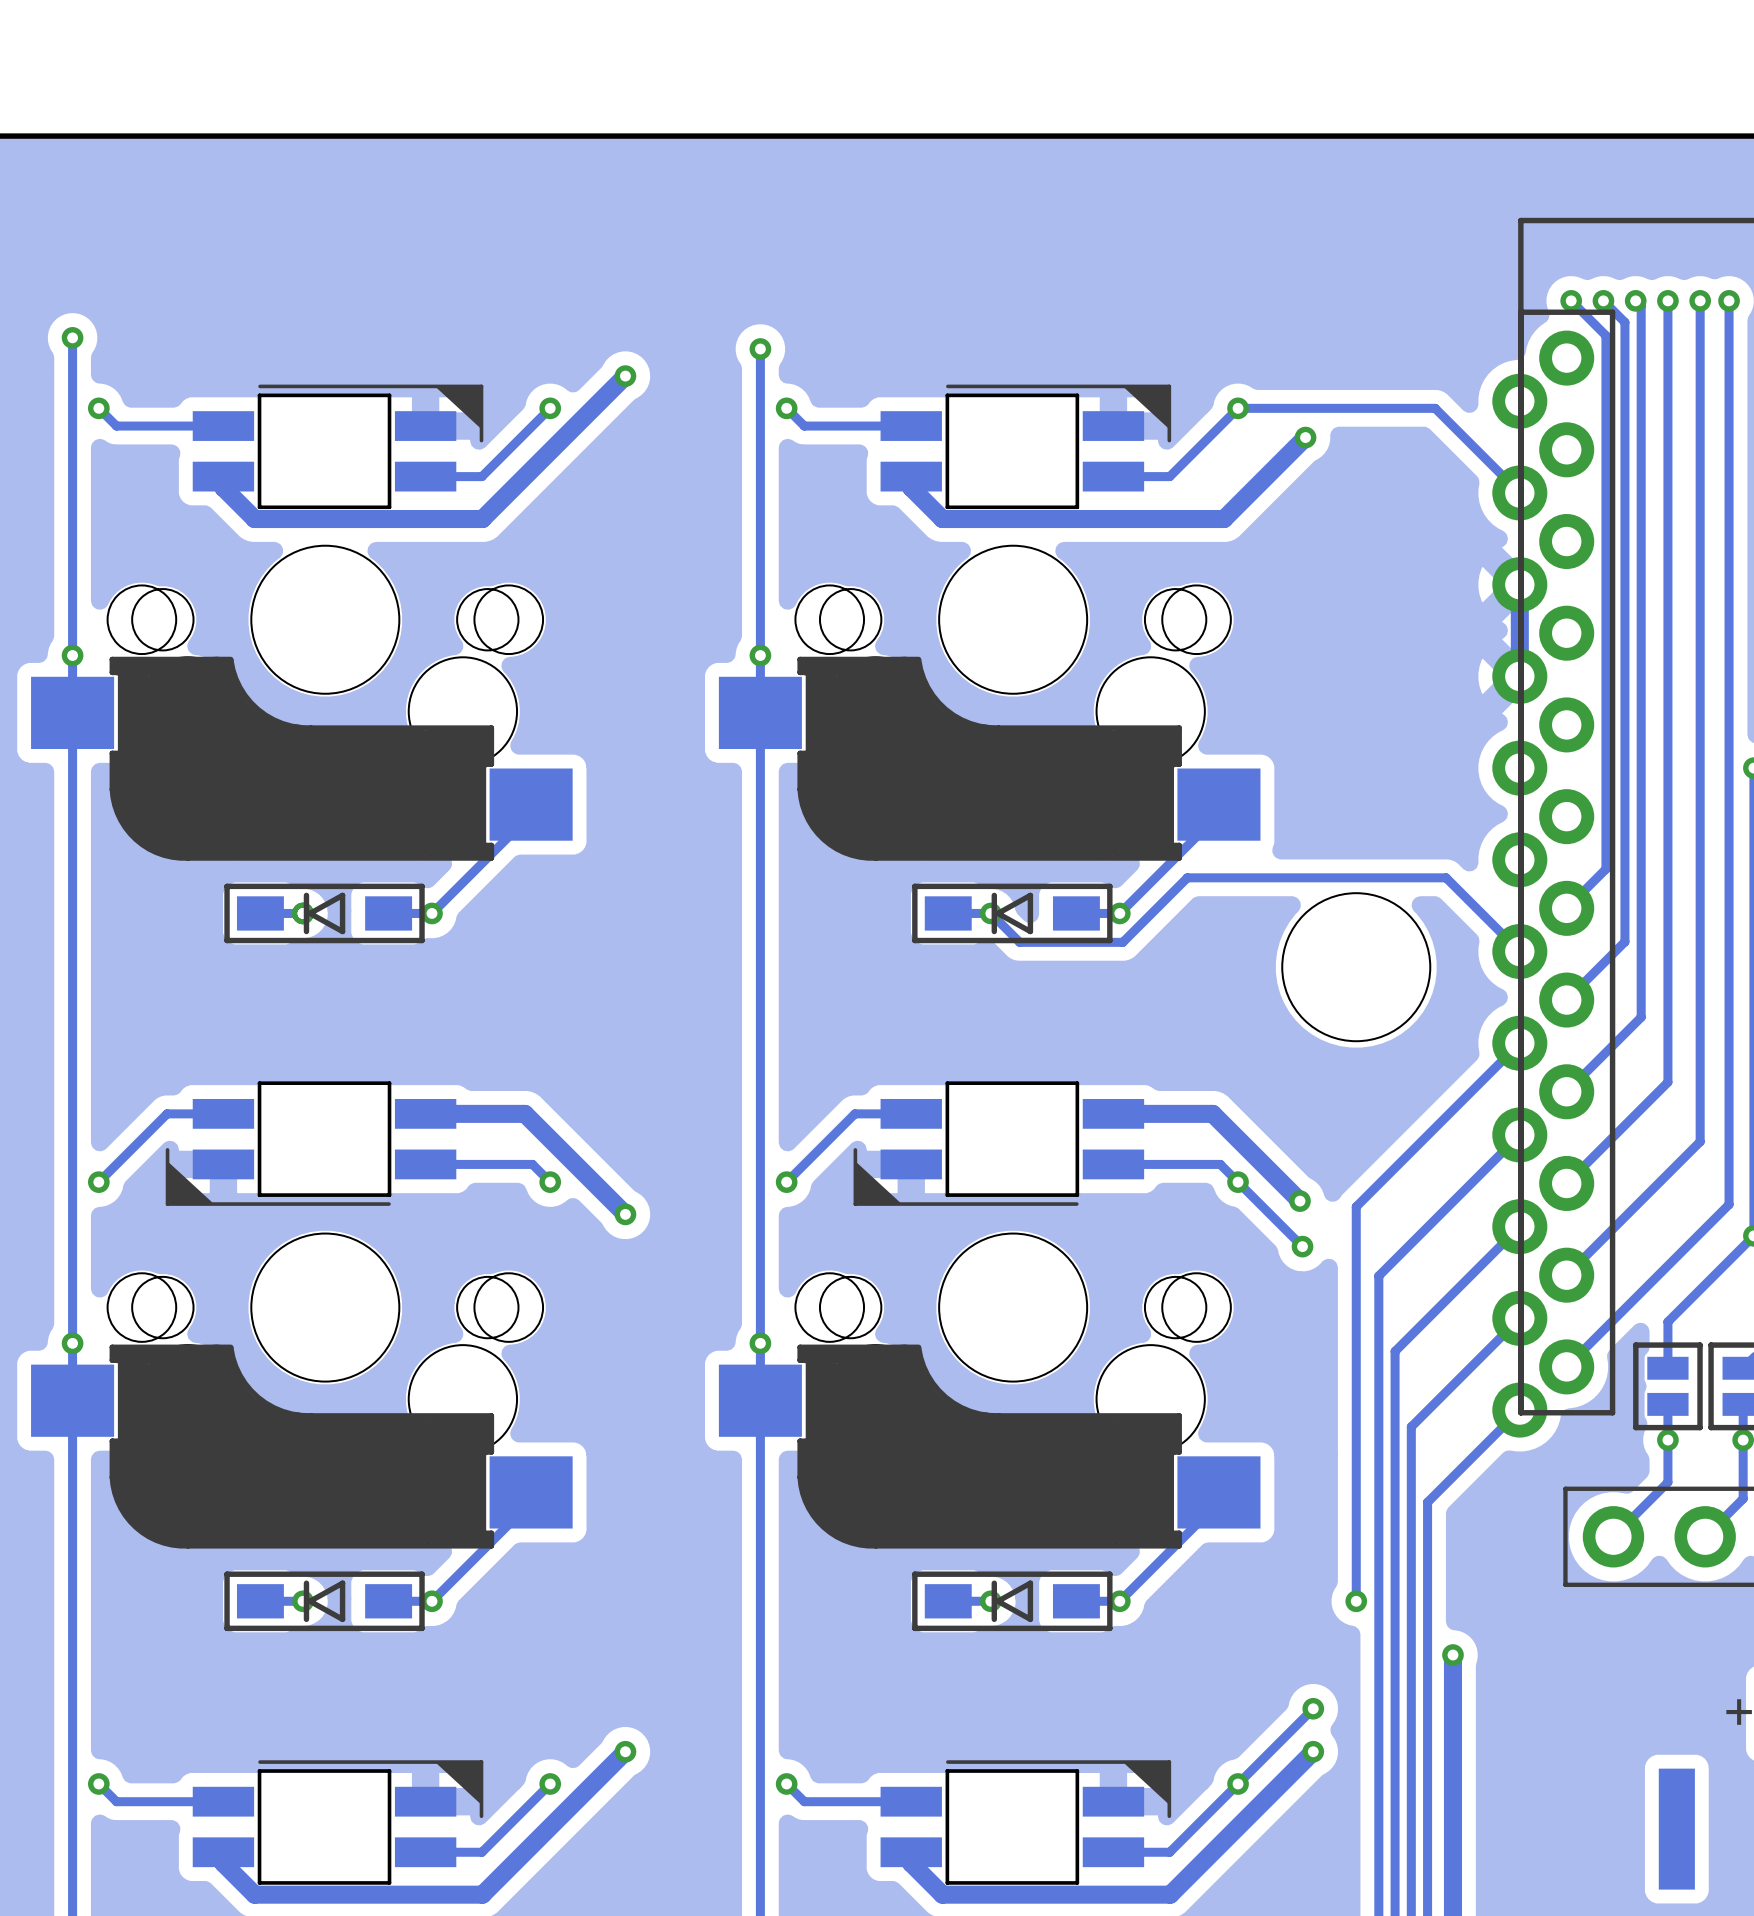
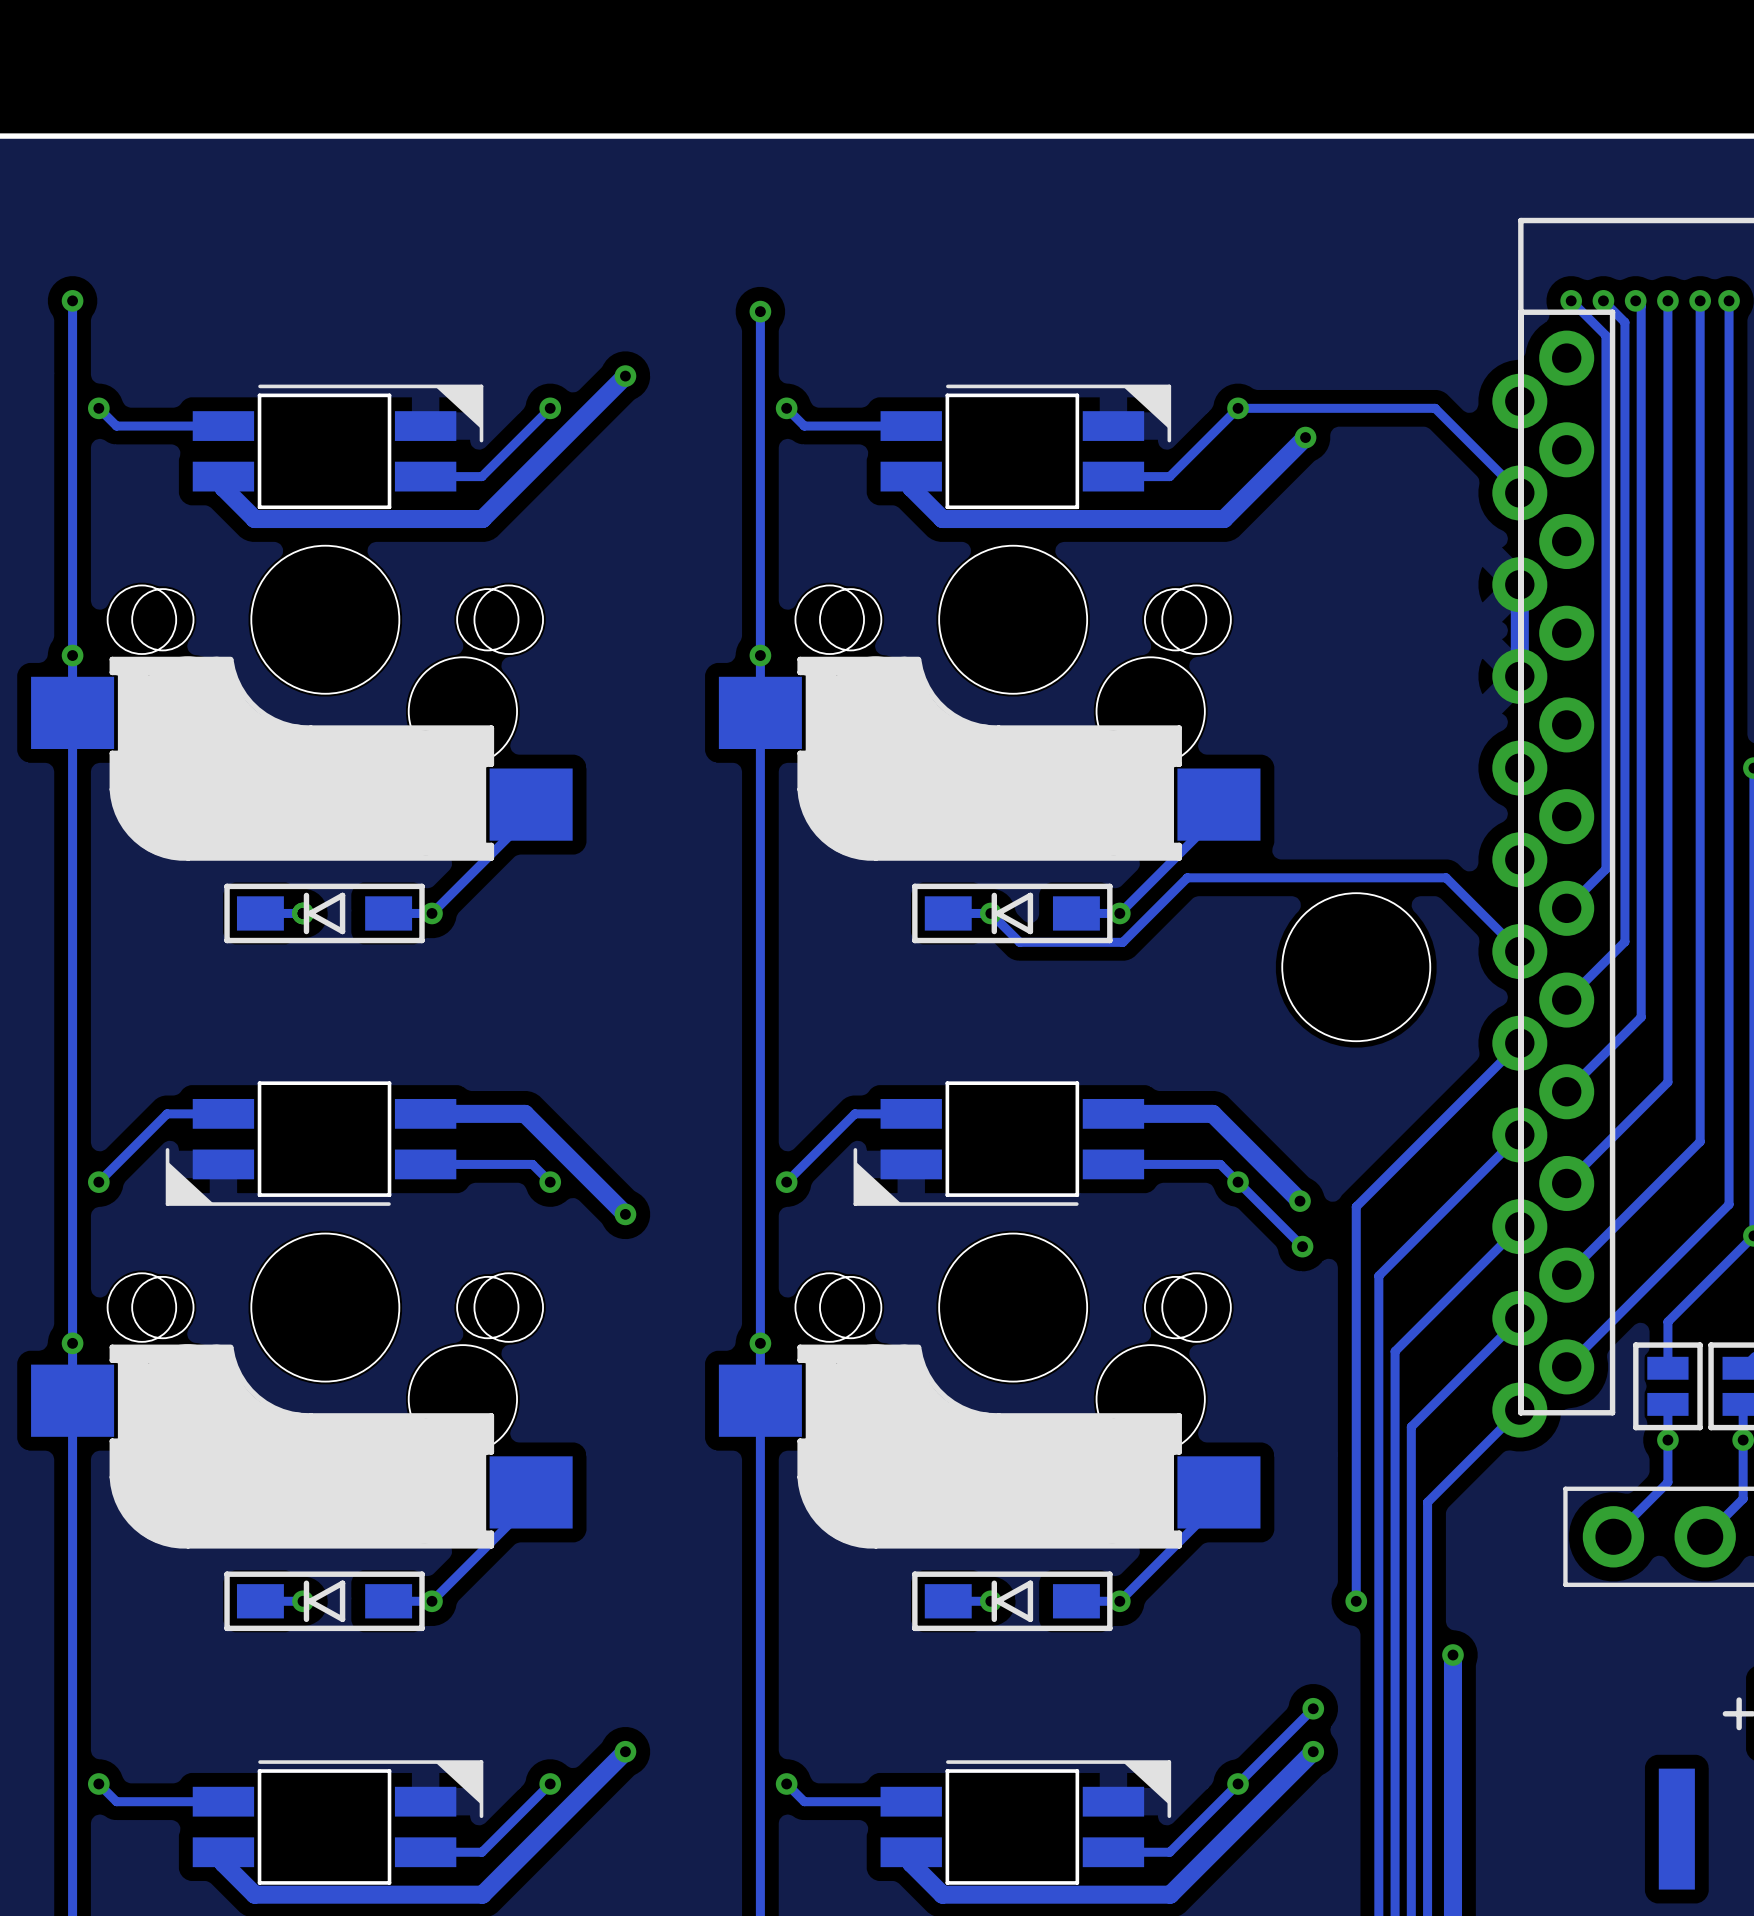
track: none -> (72, 300) (72, 337)
track: none -> (760, 311) (760, 349)
via position: (72, 337) -> (72, 300)
via position: (760, 349) -> (760, 311)

